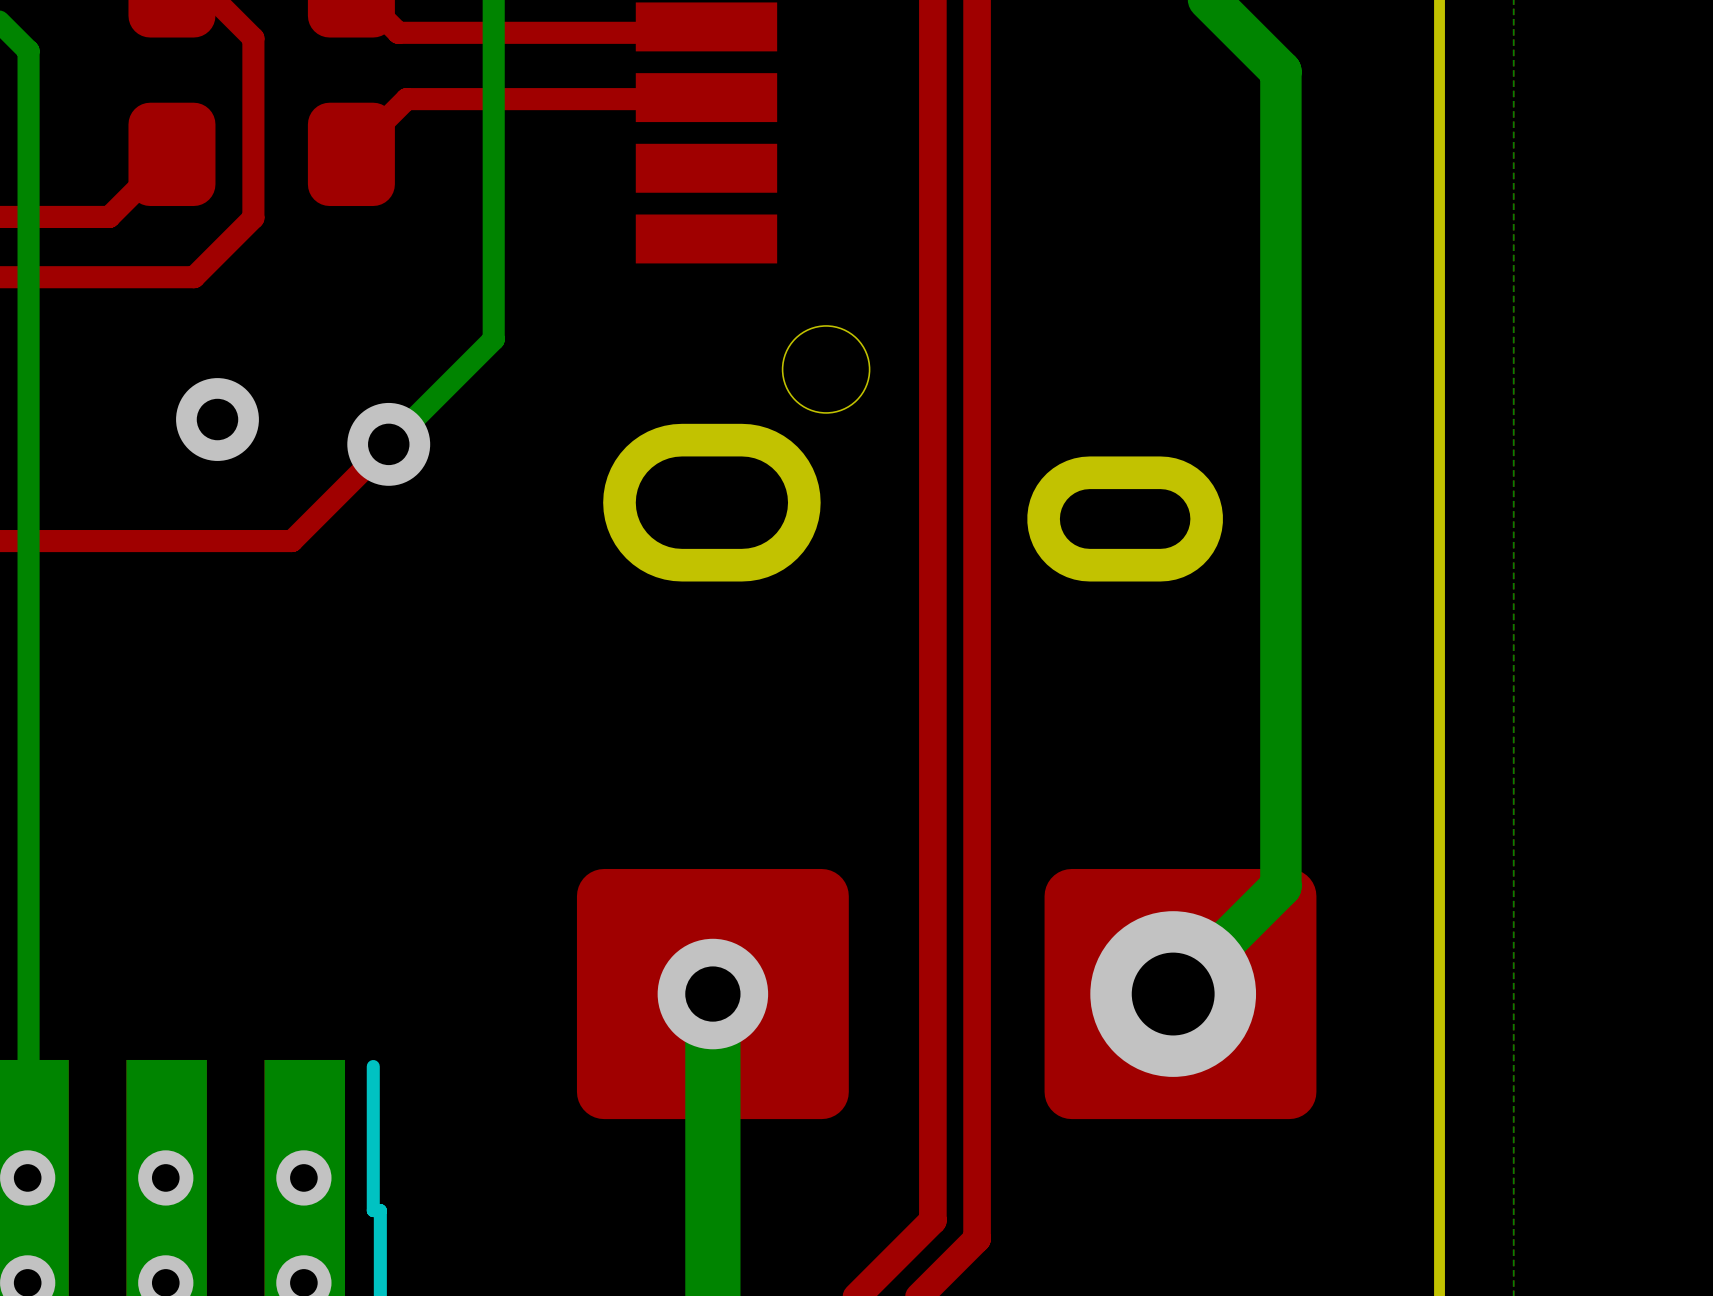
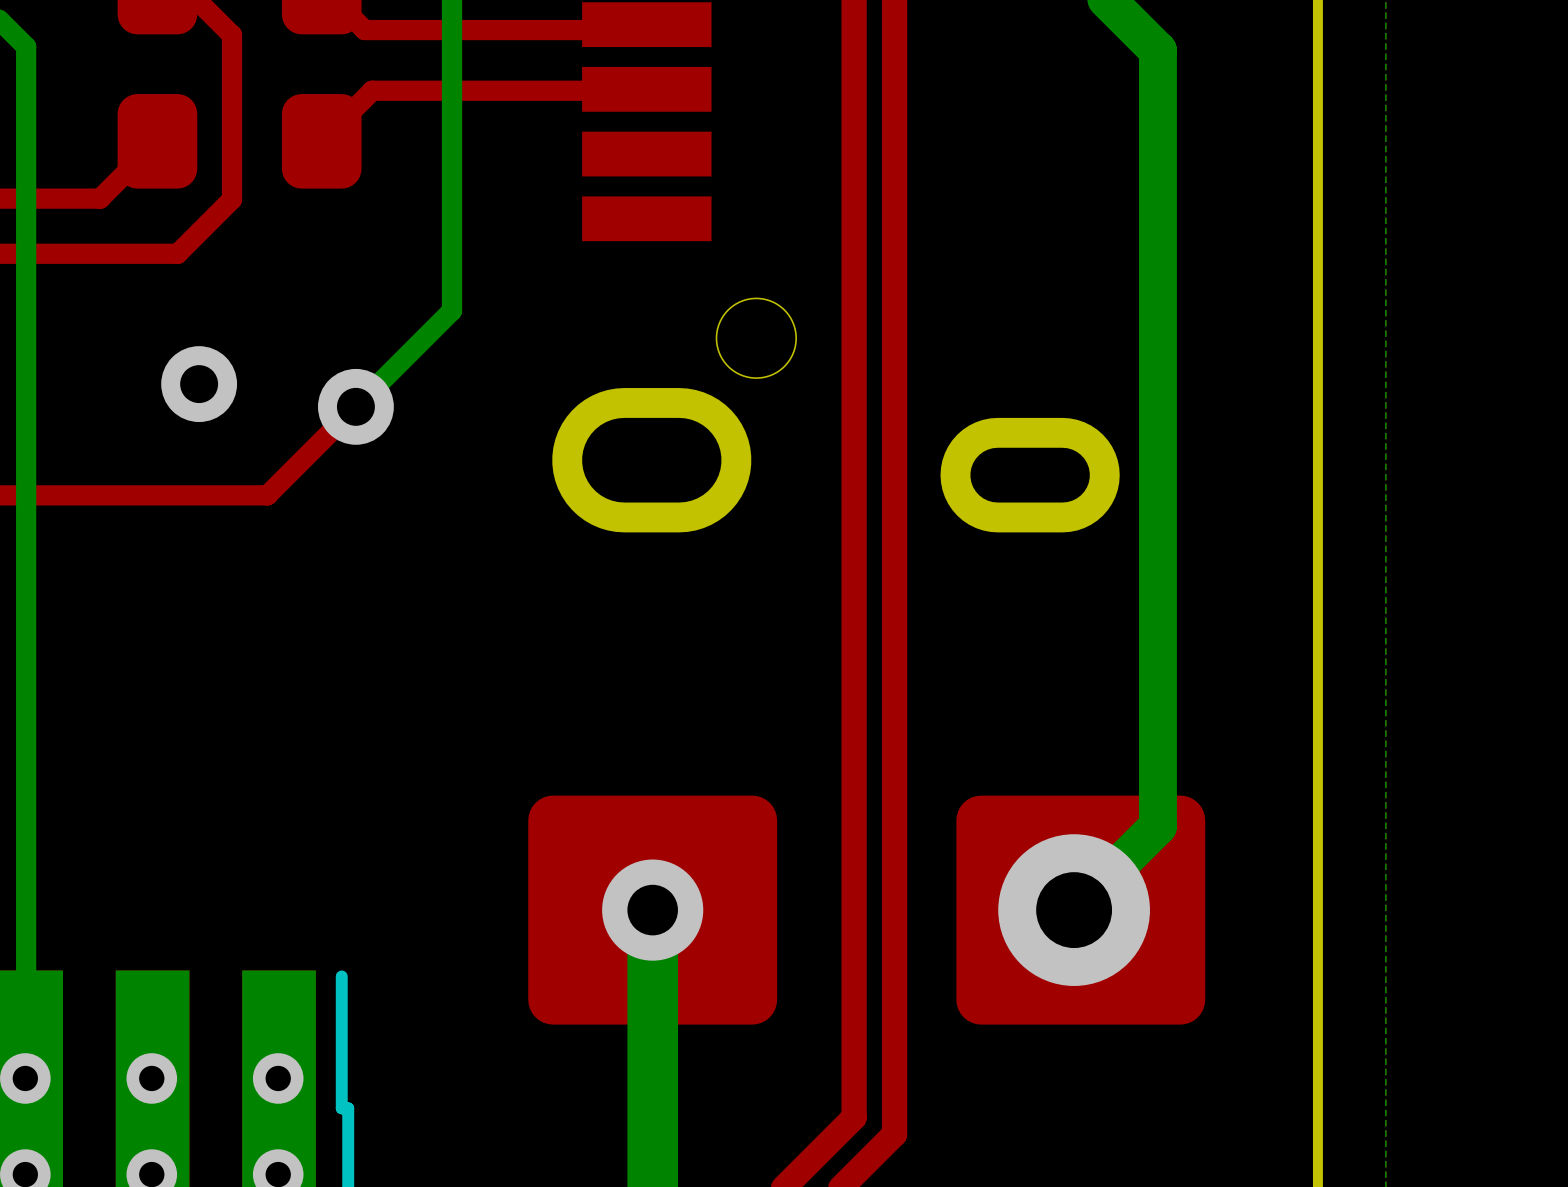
bottom track: (1264, 55) (1280, 71) (1280, 886) (1264, 902) -> (1157, 50) (1157, 826)

